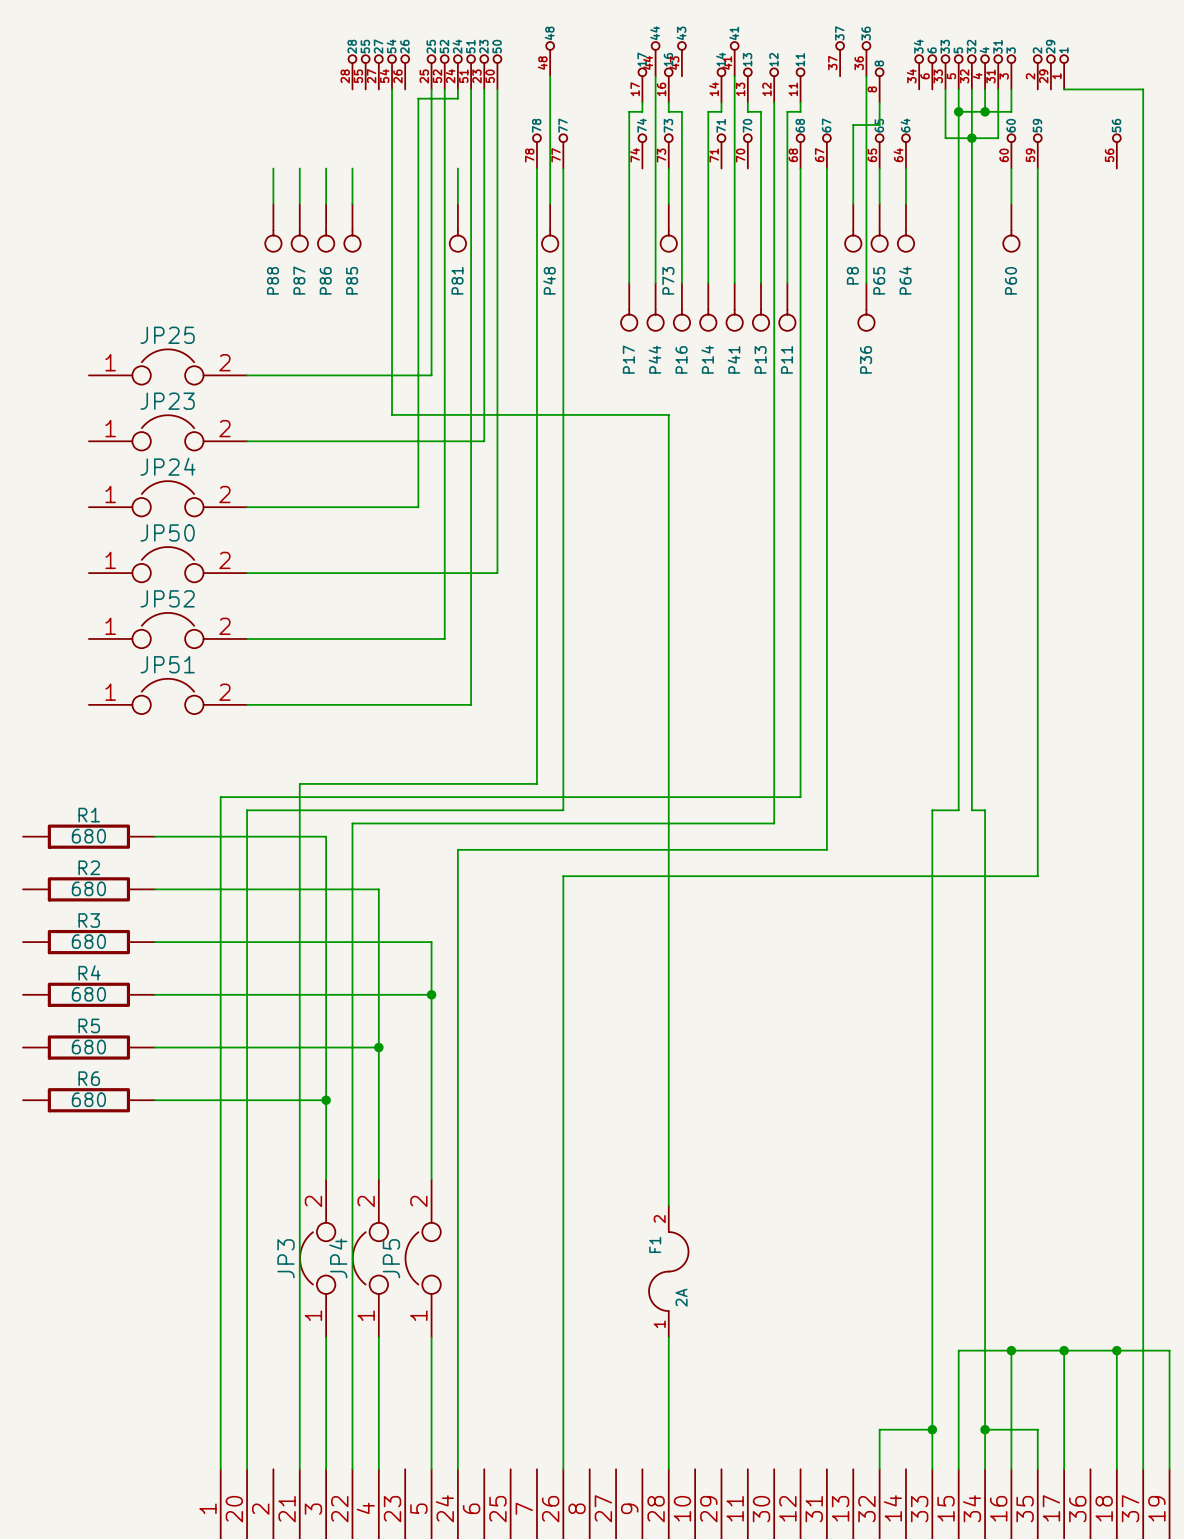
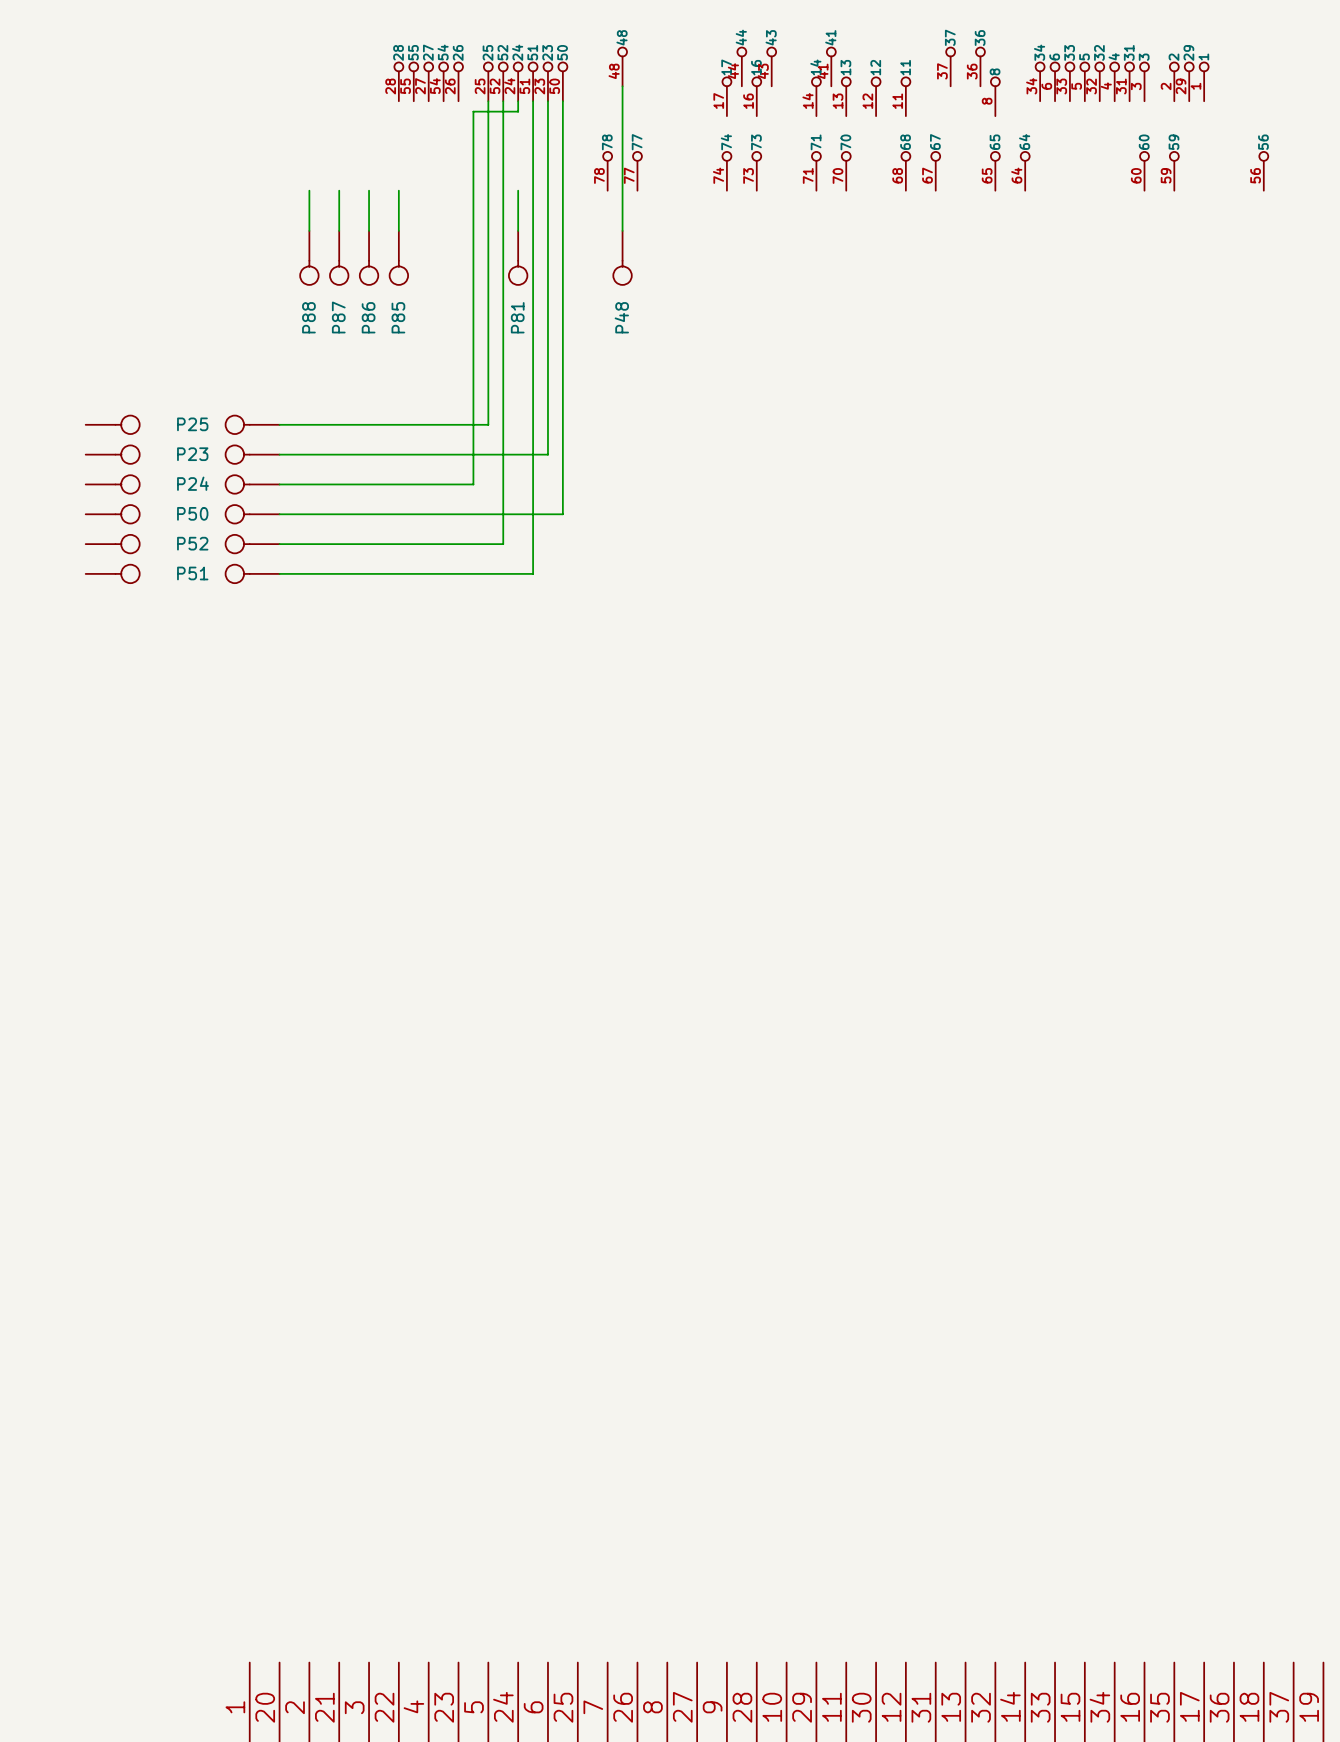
wire: (655, 76) (655, 283) -> none
wire: (734, 76) (734, 283) -> none
wire: (866, 76) (866, 283) -> none
wire: (392, 89) (392, 414) (668, 414) (668, 1205) -> none
wire: (945, 89) (945, 138) (998, 138) (998, 89) -> none
wire: (958, 89) (958, 810) (932, 810) (932, 1469) -> none
wire: (971, 89) (971, 810) (985, 810) (985, 1469) -> none
wire: (985, 89) (985, 111) -> none
wire: (1011, 89) (1011, 111) (958, 111) -> none
wire: (1064, 89) (1143, 89) (1143, 1469) -> none
wire: (642, 102) (642, 111) (629, 111) (629, 283) -> none
wire: (668, 102) (668, 111) (681, 111) (681, 283) -> none
wire: (721, 102) (721, 111) (708, 111) (708, 283) -> none
wire: (747, 102) (747, 111) (761, 111) (761, 283) -> none
wire: (774, 102) (774, 823) (352, 823) (352, 1469) -> none
wire: (800, 102) (800, 111) (787, 111) (787, 283) -> none
wire: (879, 102) (879, 125) (853, 125) (853, 204) -> none
junction: (958, 111) -> none
junction: (985, 111) -> none
junction: (971, 138) -> none
wire: (536, 168) (536, 783) (299, 783) (299, 1469) -> none
wire: (563, 168) (563, 810) (247, 810) (247, 1469) -> none
wire: (668, 168) (668, 204) -> none
wire: (800, 168) (800, 797) (220, 797) (220, 1469) -> none
wire: (826, 168) (826, 849) (457, 849) (457, 1469) -> none
wire: (879, 168) (879, 204) -> none
wire: (905, 168) (905, 204) -> none
wire: (1011, 168) (1011, 204) -> none
wire: (1037, 168) (1037, 876) (563, 876) (563, 1469) -> none
P73: (668, 227) -> none
P8: (853, 227) -> none
P65: (879, 227) -> none
P64: (905, 227) -> none
P60: (1011, 227) -> none
P17: (629, 307) -> none
P44: (655, 307) -> none
P16: (681, 307) -> none
P14: (708, 307) -> none
P41: (734, 307) -> none
P13: (761, 307) -> none
P11: (787, 307) -> none
P36: (866, 307) -> none
JP25: (167, 366) -> none
part: none -> (112, 424)
P25: none -> (252, 424)
part: none -> (112, 454)
P23: none -> (252, 454)
wire: (484, 401) (484, 441) (247, 441) -> (547, 454) (279, 454)
part: none -> (112, 484)
P24: none -> (252, 484)
wire: none -> (279, 484) (473, 484)
wire: (418, 428) (418, 507) -> (533, 573) (473, 573)
JP23: (167, 432) -> none
part: none -> (112, 514)
P50: none -> (252, 514)
wire: (497, 454) (497, 573) (247, 573) -> (562, 514) (279, 514)
part: none -> (112, 544)
P52: none -> (252, 544)
wire: (444, 480) (444, 638) (247, 638) -> (503, 544) (279, 544)
JP24: (167, 498) -> none
part: none -> (112, 573)
P51: none -> (252, 573)
wire: (471, 507) (471, 704) (247, 704) -> none
JP50: (167, 564) -> none
JP52: (167, 630) -> none
JP51: (167, 696) -> none
R1: 680 (88, 836) -> none
wire: (154, 836) (326, 836) (326, 1179) -> none
R2: 680 (88, 889) -> none
wire: (154, 889) (378, 889) (378, 1179) -> none
R3: 680 (88, 942) -> none
wire: (154, 942) (431, 942) (431, 1179) -> none
R4: 680 (88, 994) -> none
wire: (154, 994) (431, 994) -> none
junction: (431, 994) -> none
R5: 680 (88, 1047) -> none
wire: (154, 1047) (378, 1047) -> none
junction: (378, 1047) -> none
R6: 680 (88, 1100) -> none
wire: (154, 1100) (326, 1100) -> none
junction: (326, 1100) -> none
JP3: (317, 1258) -> none
JP4: (370, 1258) -> none
JP5: (423, 1258) -> none
F1: 2A (668, 1271) -> none
wire: (326, 1337) (326, 1469) -> none
wire: (378, 1337) (378, 1469) -> none
wire: (431, 1337) (431, 1469) -> none
wire: (668, 1337) (668, 1469) -> none
wire: (1011, 1350) (1011, 1469) -> none
junction: (1011, 1350) -> none
wire: (1064, 1350) (1064, 1469) -> none
junction: (1064, 1350) -> none
wire: (1116, 1350) (1116, 1469) -> none
junction: (1116, 1350) -> none
wire: (932, 1429) (879, 1429) (879, 1469) -> none
junction: (932, 1429) -> none
wire: (985, 1429) (1037, 1429) (1037, 1469) -> none
junction: (985, 1429) -> none
wire: (958, 1469) (958, 1350) (1169, 1350) (1169, 1469) -> none

